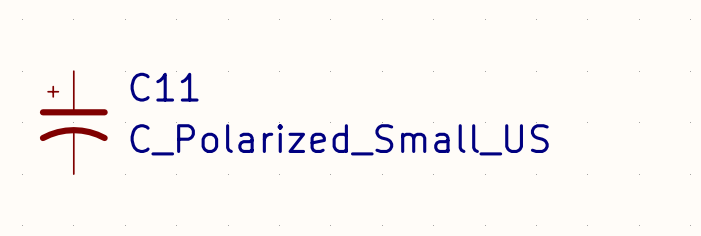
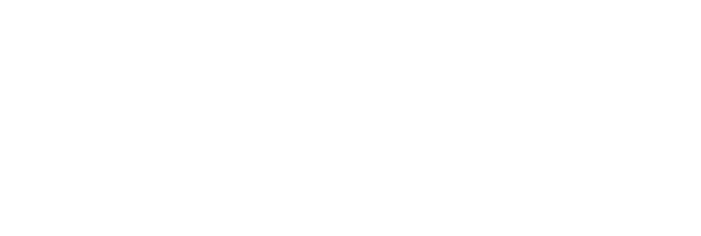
C11: C_Polarized_Small_US (73, 122) -> none

